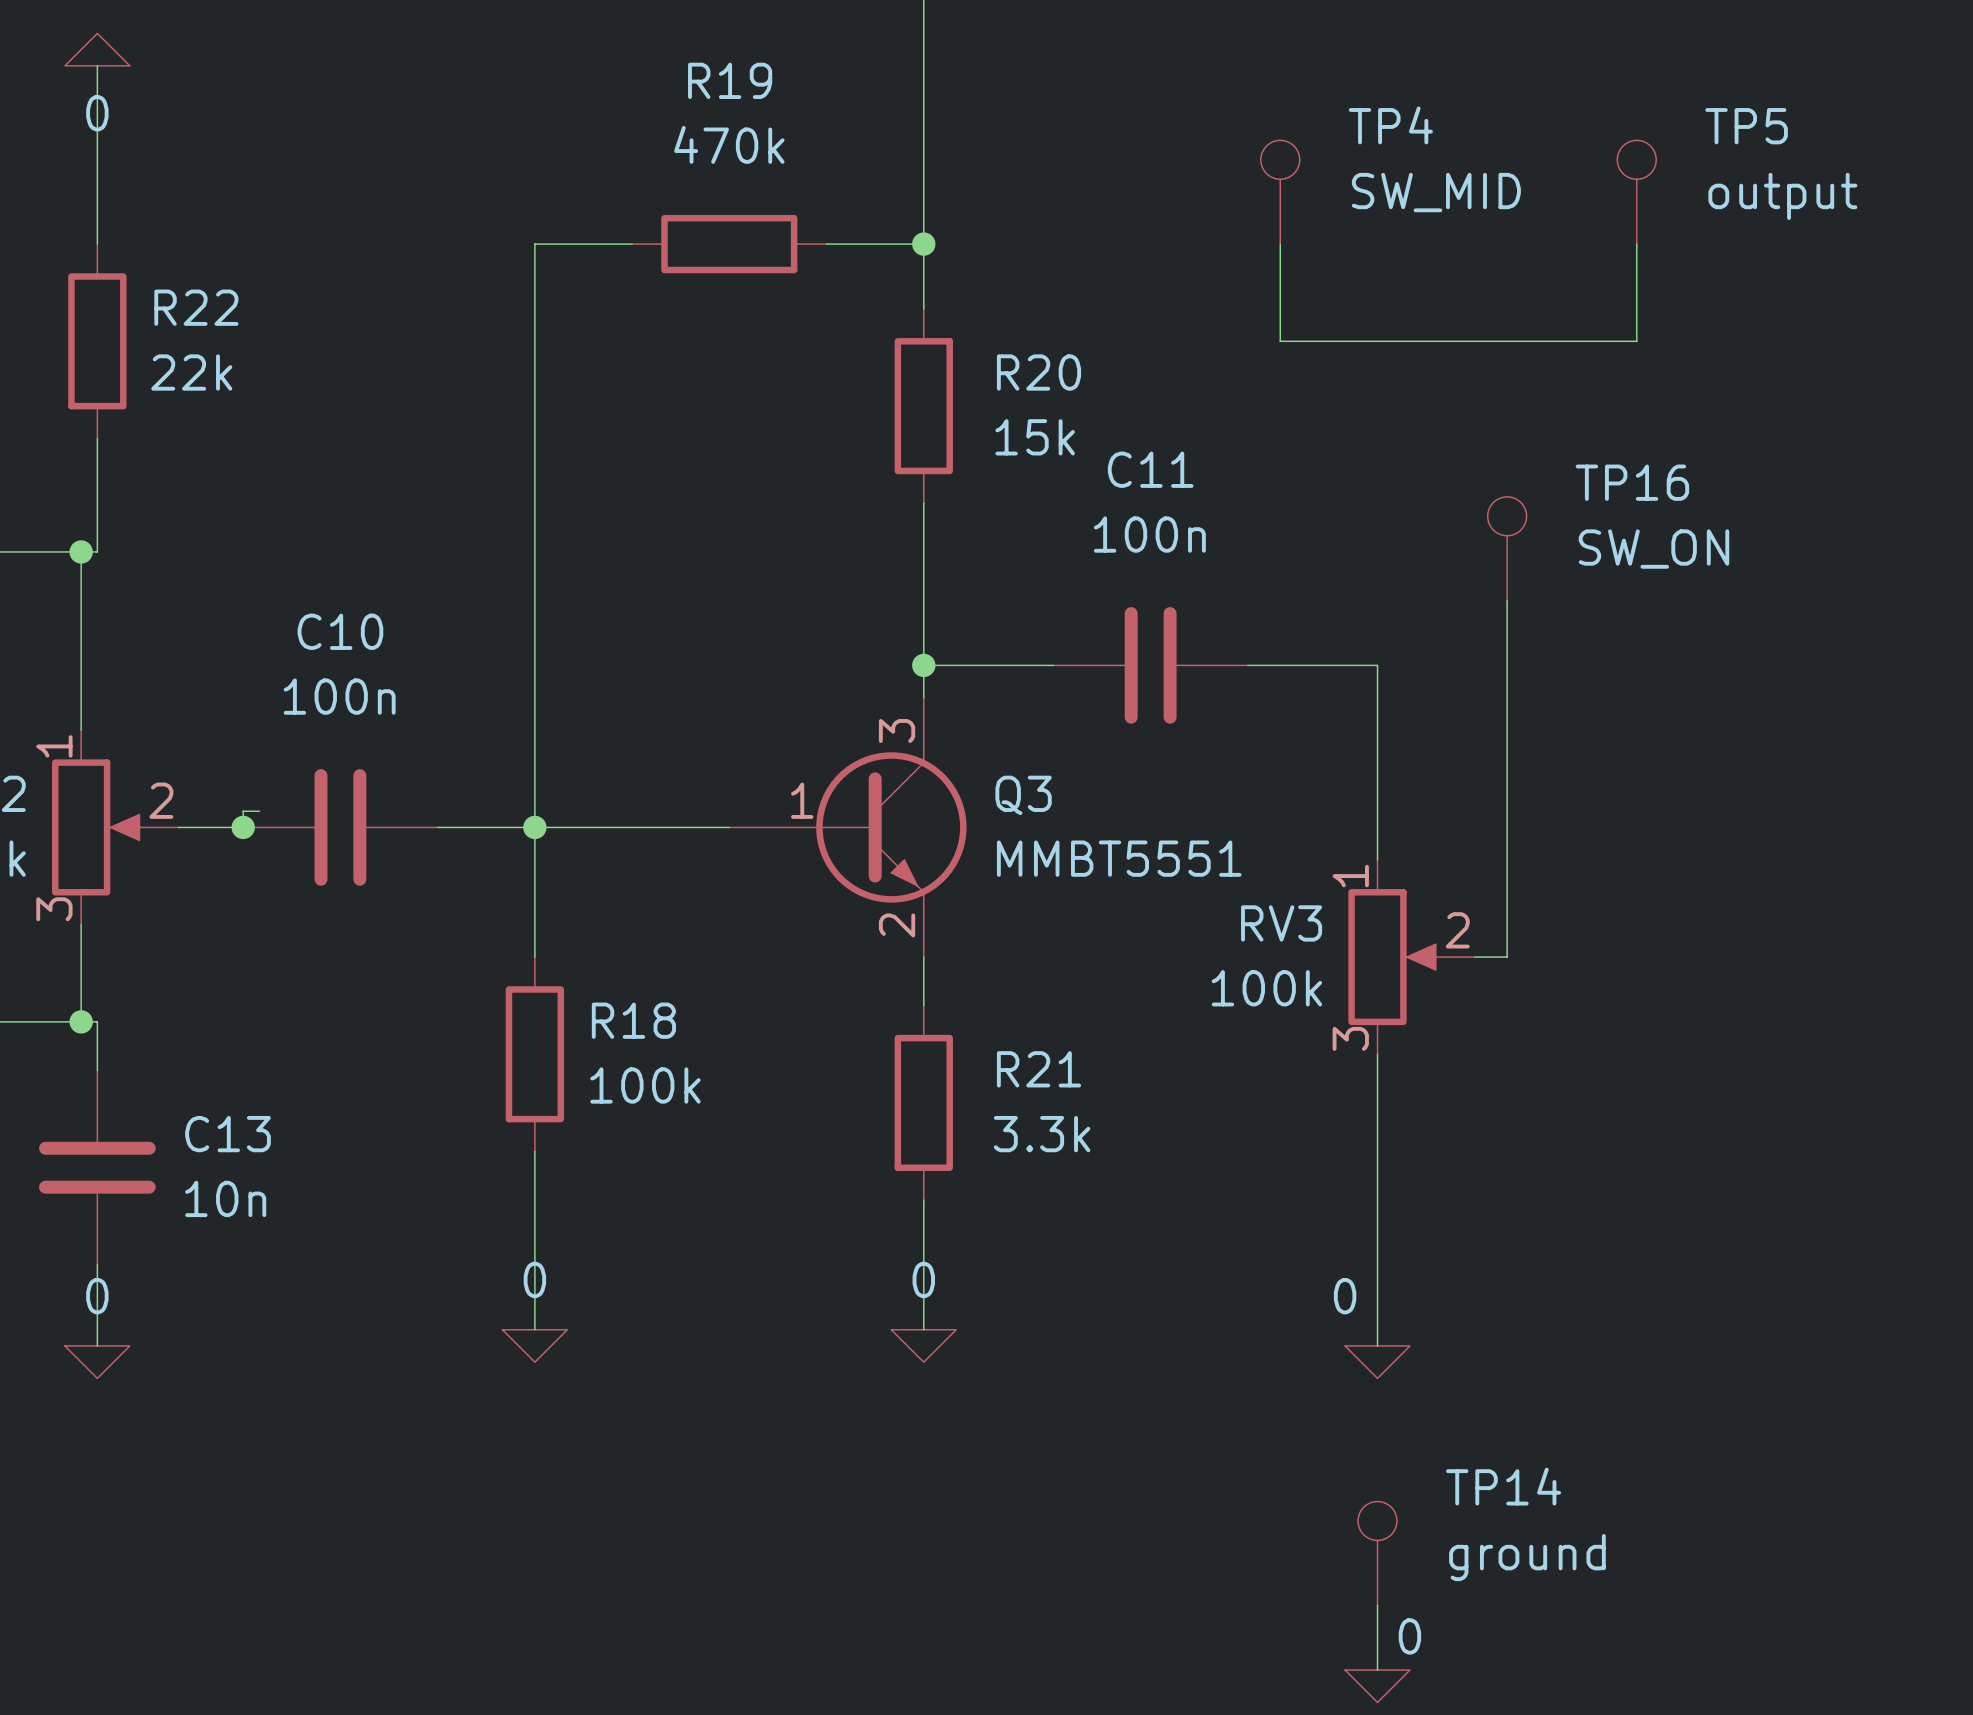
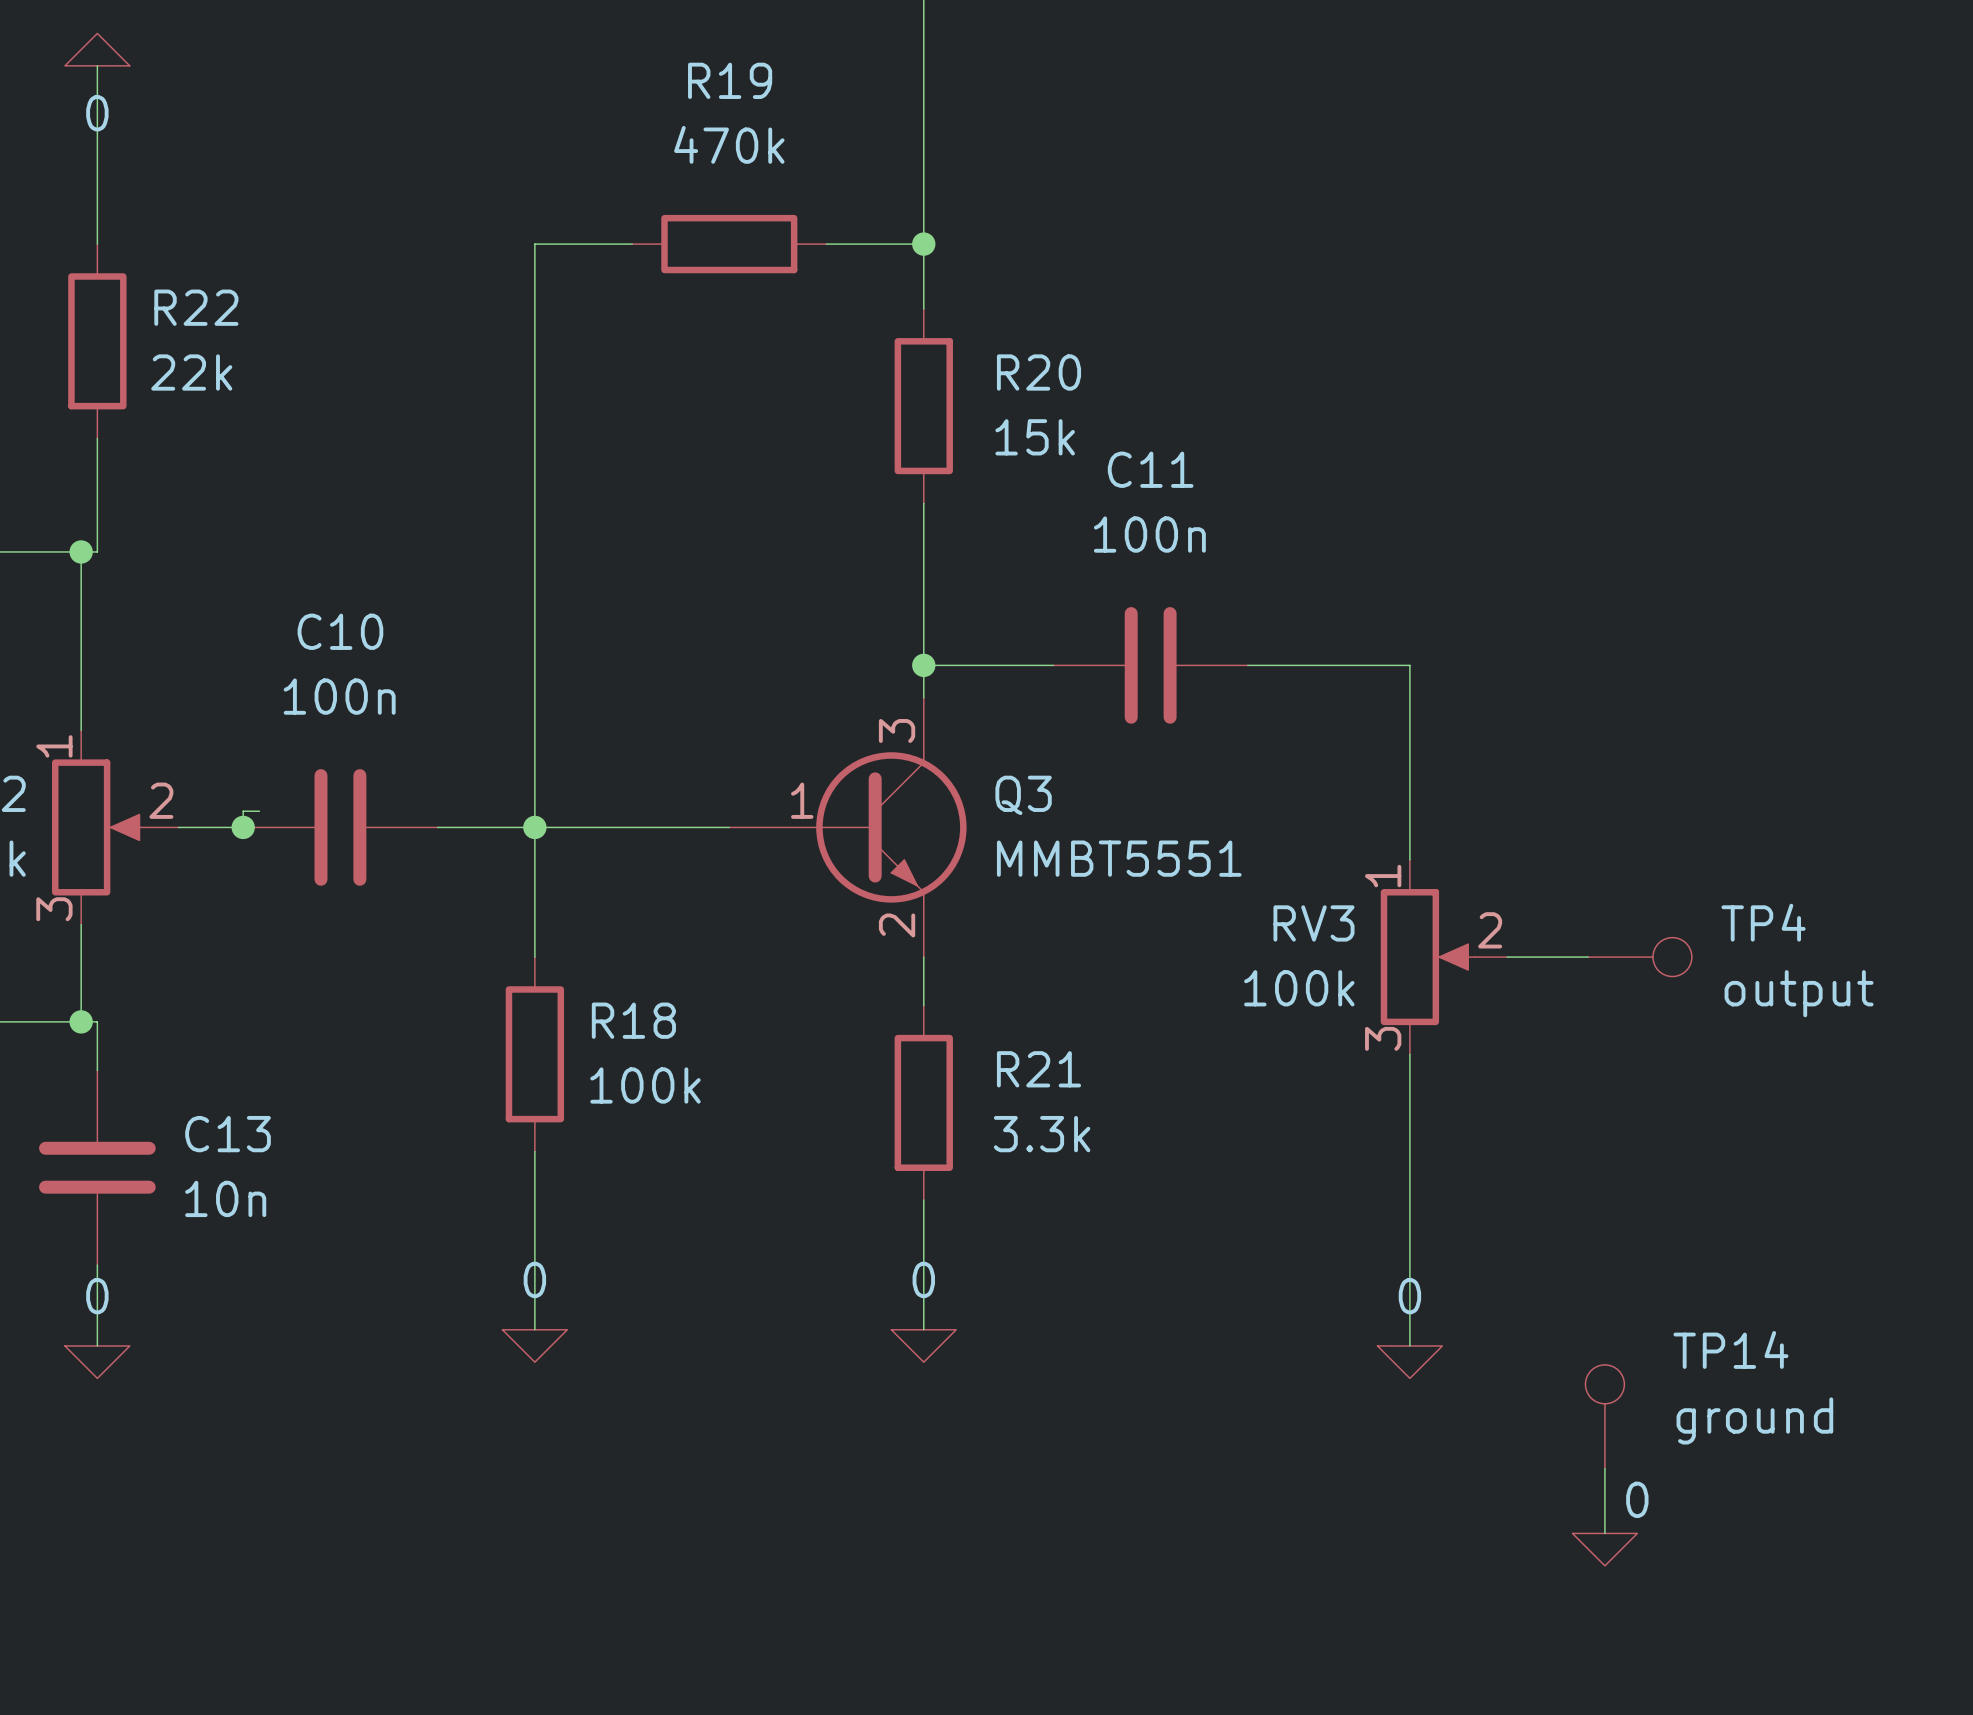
TP4 rotation: 0° (1280, 159) -> 90° clockwise (1672, 957)
TP4 position: (1280, 192) -> (1640, 957)
TP4 value: SW_MID (1436, 192) -> output (1799, 993)
TP5: output (1636, 192) -> none
wire: (1280, 244) (1280, 341) (1636, 341) (1636, 244) -> none
TP16: SW_ON (1507, 548) -> none
wire: (1507, 600) (1507, 957) (1474, 957) -> none
wire: (1377, 665) (1377, 859) -> (1377, 665) (1409, 665) (1409, 859)
RV3 position: (1411, 957) -> (1443, 957)
wire: none -> (1507, 957) (1588, 957)
wire: (1377, 1054) (1377, 1345) -> (1409, 1054) (1409, 1345)
power symbol text position: 0 (1345, 1296) -> 0 (1409, 1296)
power symbol position: 0 (1377, 1362) -> 0 (1409, 1362)
power symbol: none -> 0 (1604, 1549)
TP14 position: (1377, 1553) -> (1604, 1416)
wire: (1377, 1605) (1377, 1670) -> (1604, 1468) (1604, 1533)
power symbol: 0 (1377, 1686) -> none

